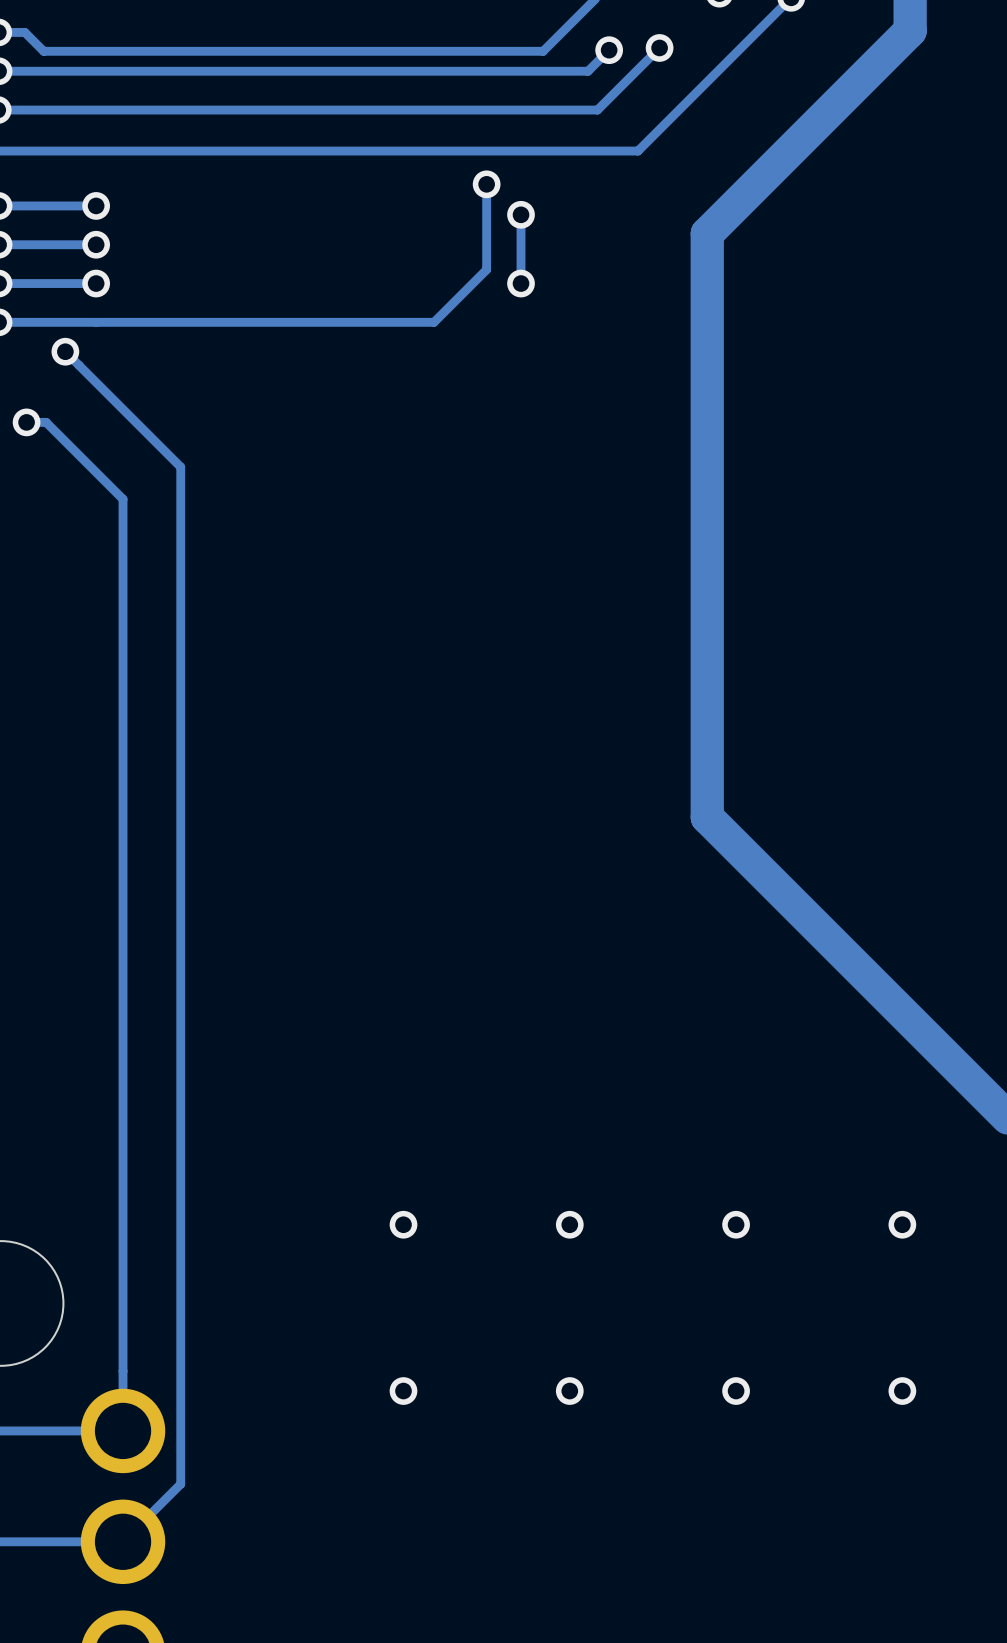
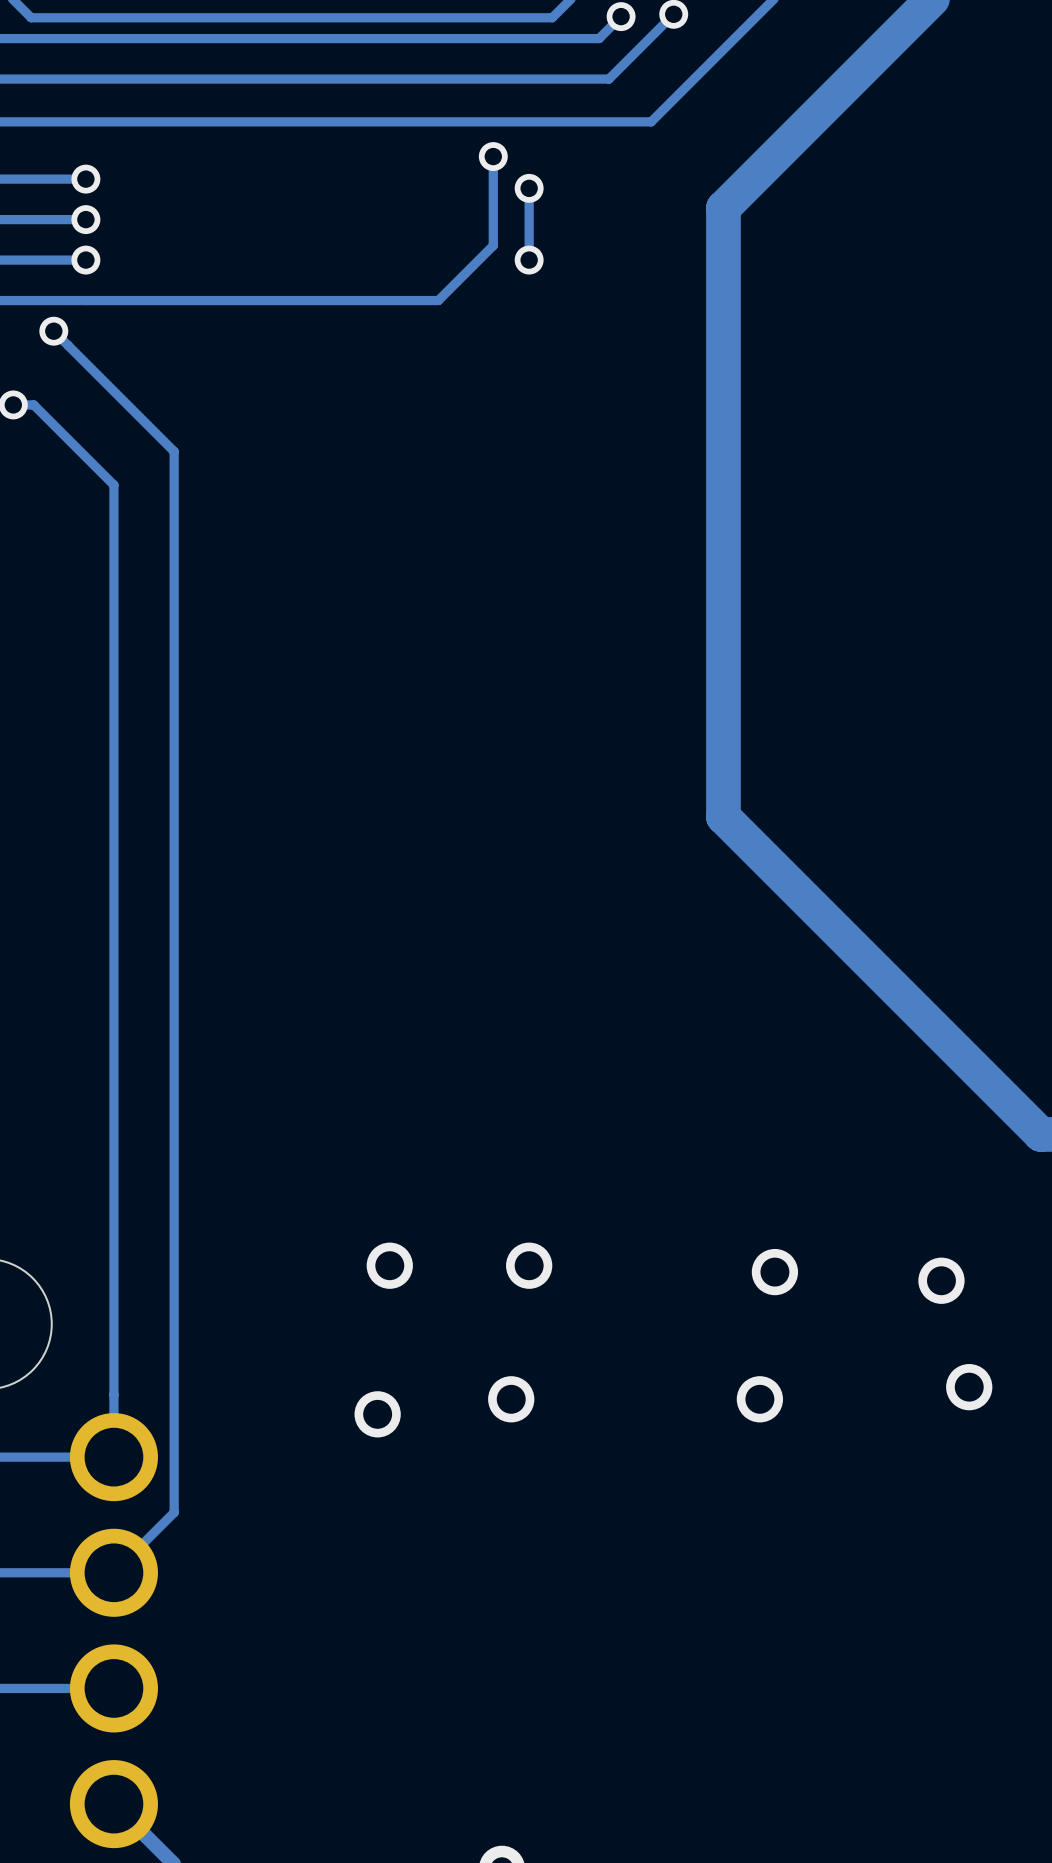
via size: [389, 1210, 418, 1239] -> [366, 1242, 413, 1289]
via: (569, 1224) -> none
via position: (736, 1224) -> (774, 1272)
via: (902, 1224) -> none
via: none -> (529, 1265)
via: none -> (941, 1280)
via: none -> (969, 1387)
via: none -> (511, 1399)
via size: [389, 1377, 418, 1405] -> [354, 1391, 401, 1438]
via size: [722, 1377, 750, 1405] -> [736, 1376, 784, 1423]
via: (569, 1391) -> none
via: (902, 1391) -> none

